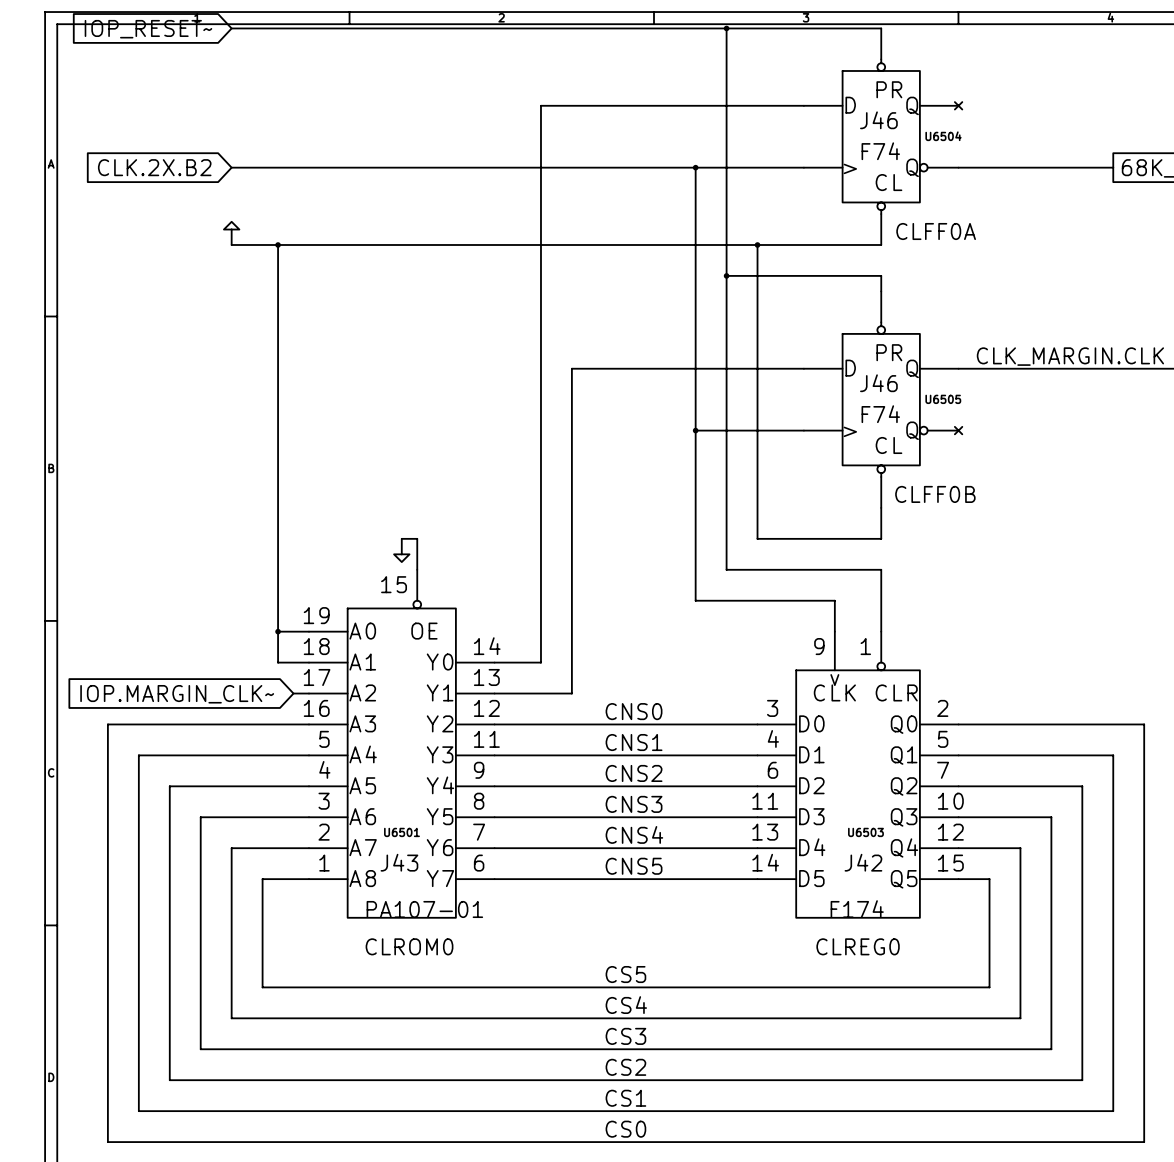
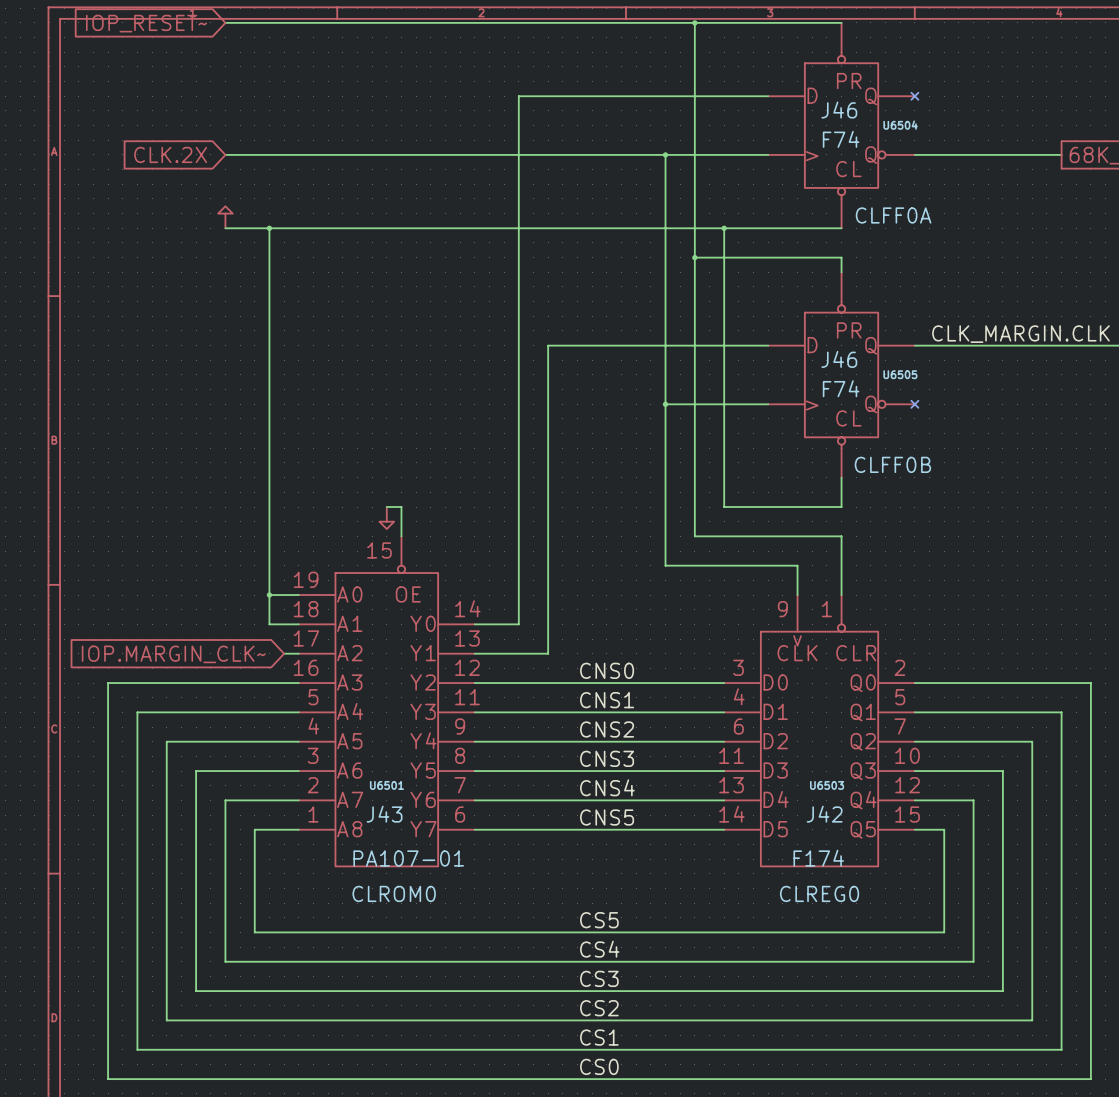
global label: CLK.2X.B2 (154, 167) -> CLK.2X (170, 154)

